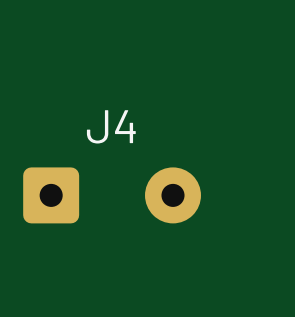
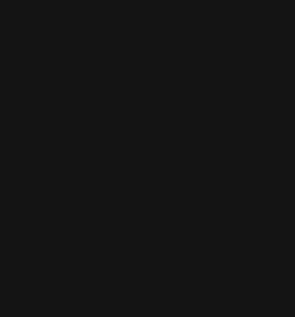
J4: (112, 195) -> none

